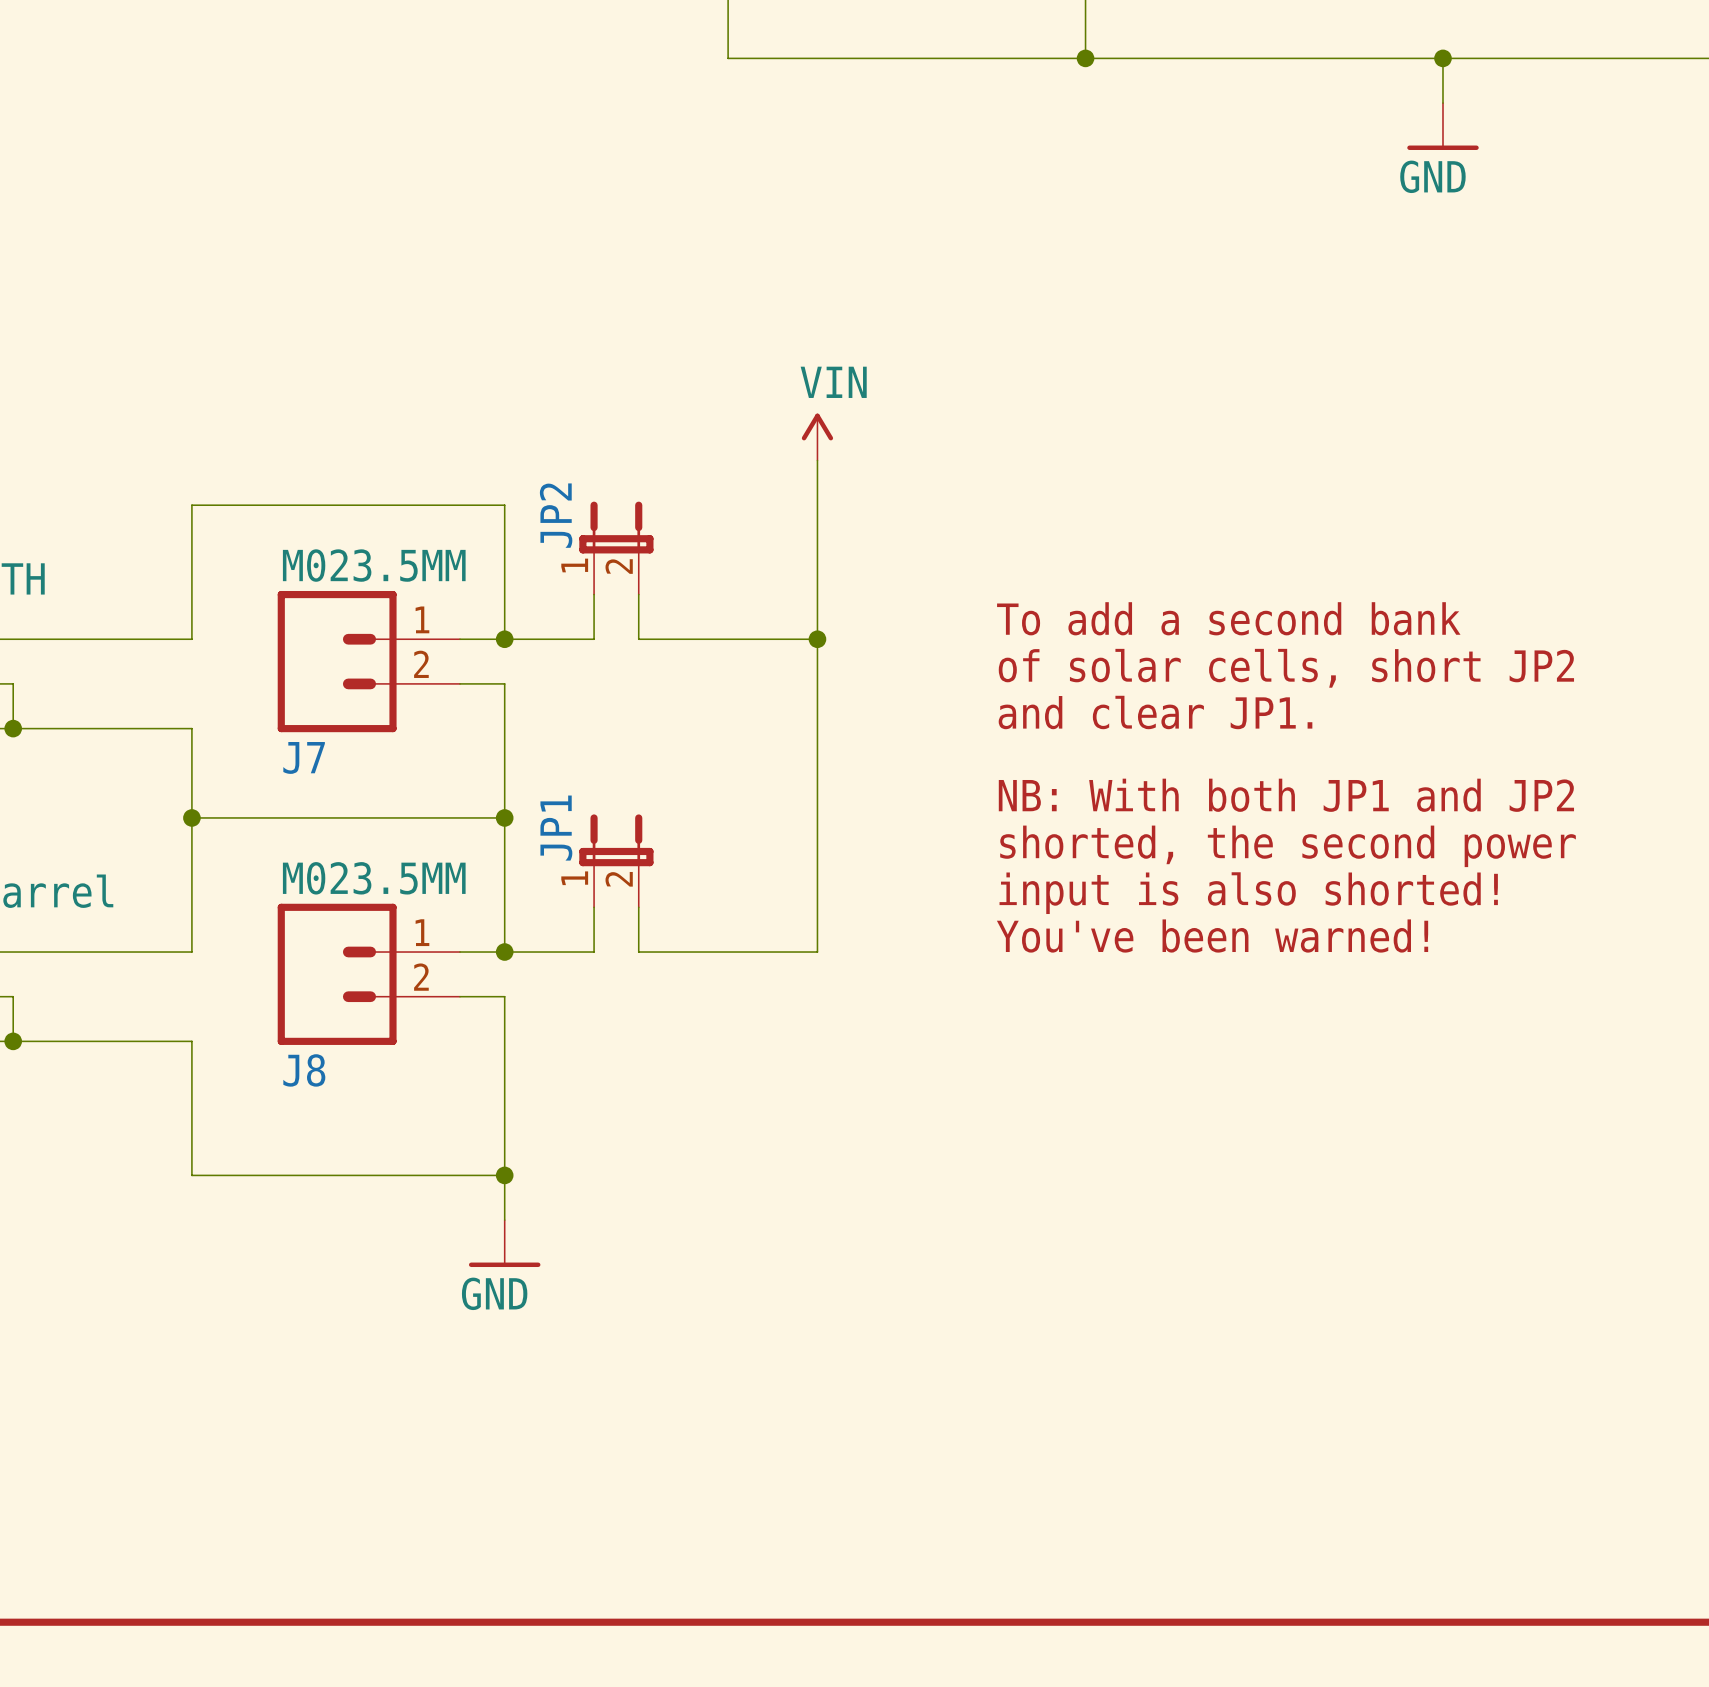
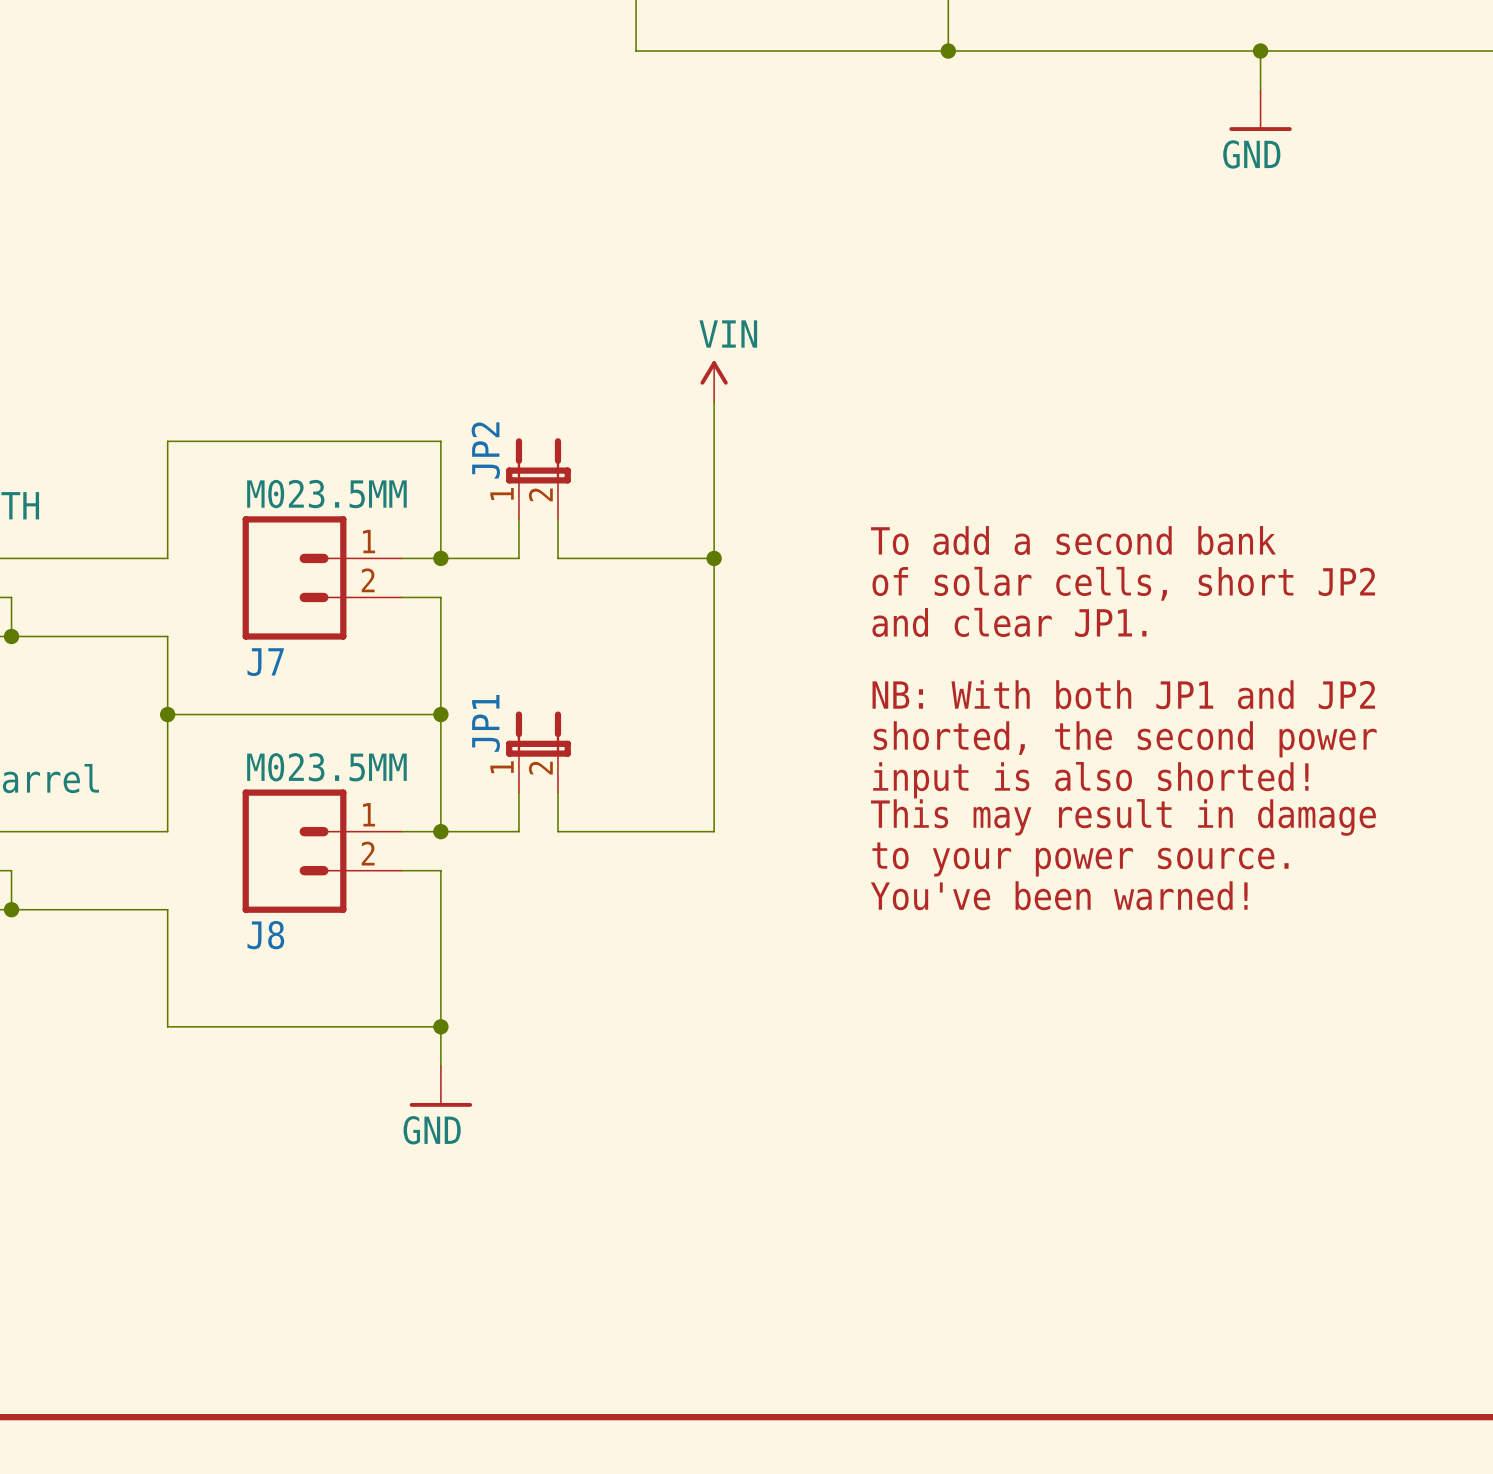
text: You've been warned! (1212, 936) -> This may result in damage (1123, 817)
text: none -> to your power source. (1080, 859)
text: none -> You've been warned! (1059, 895)

